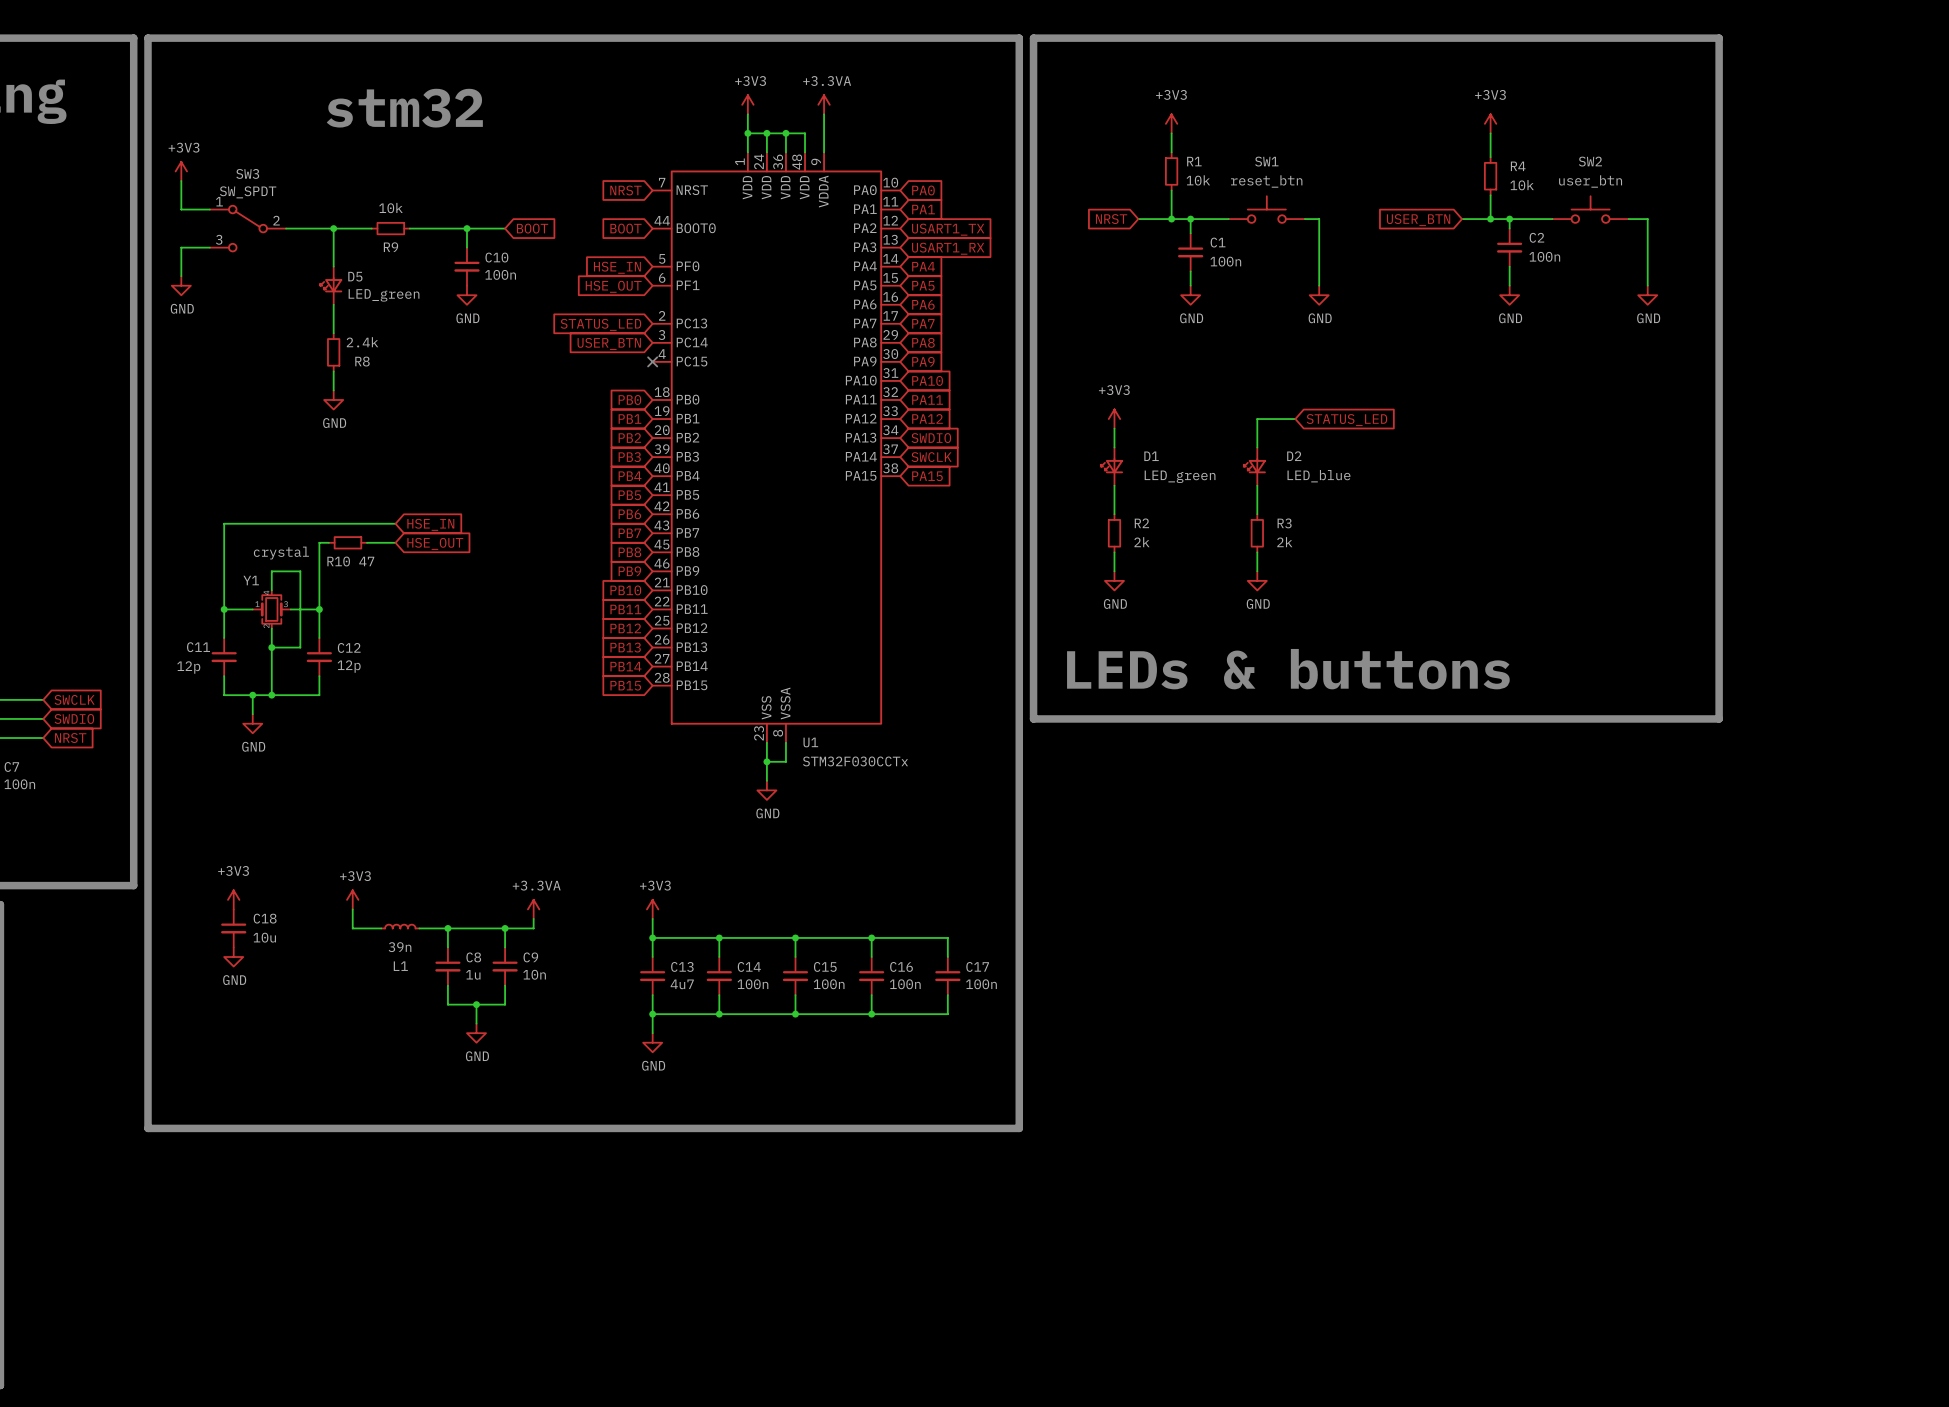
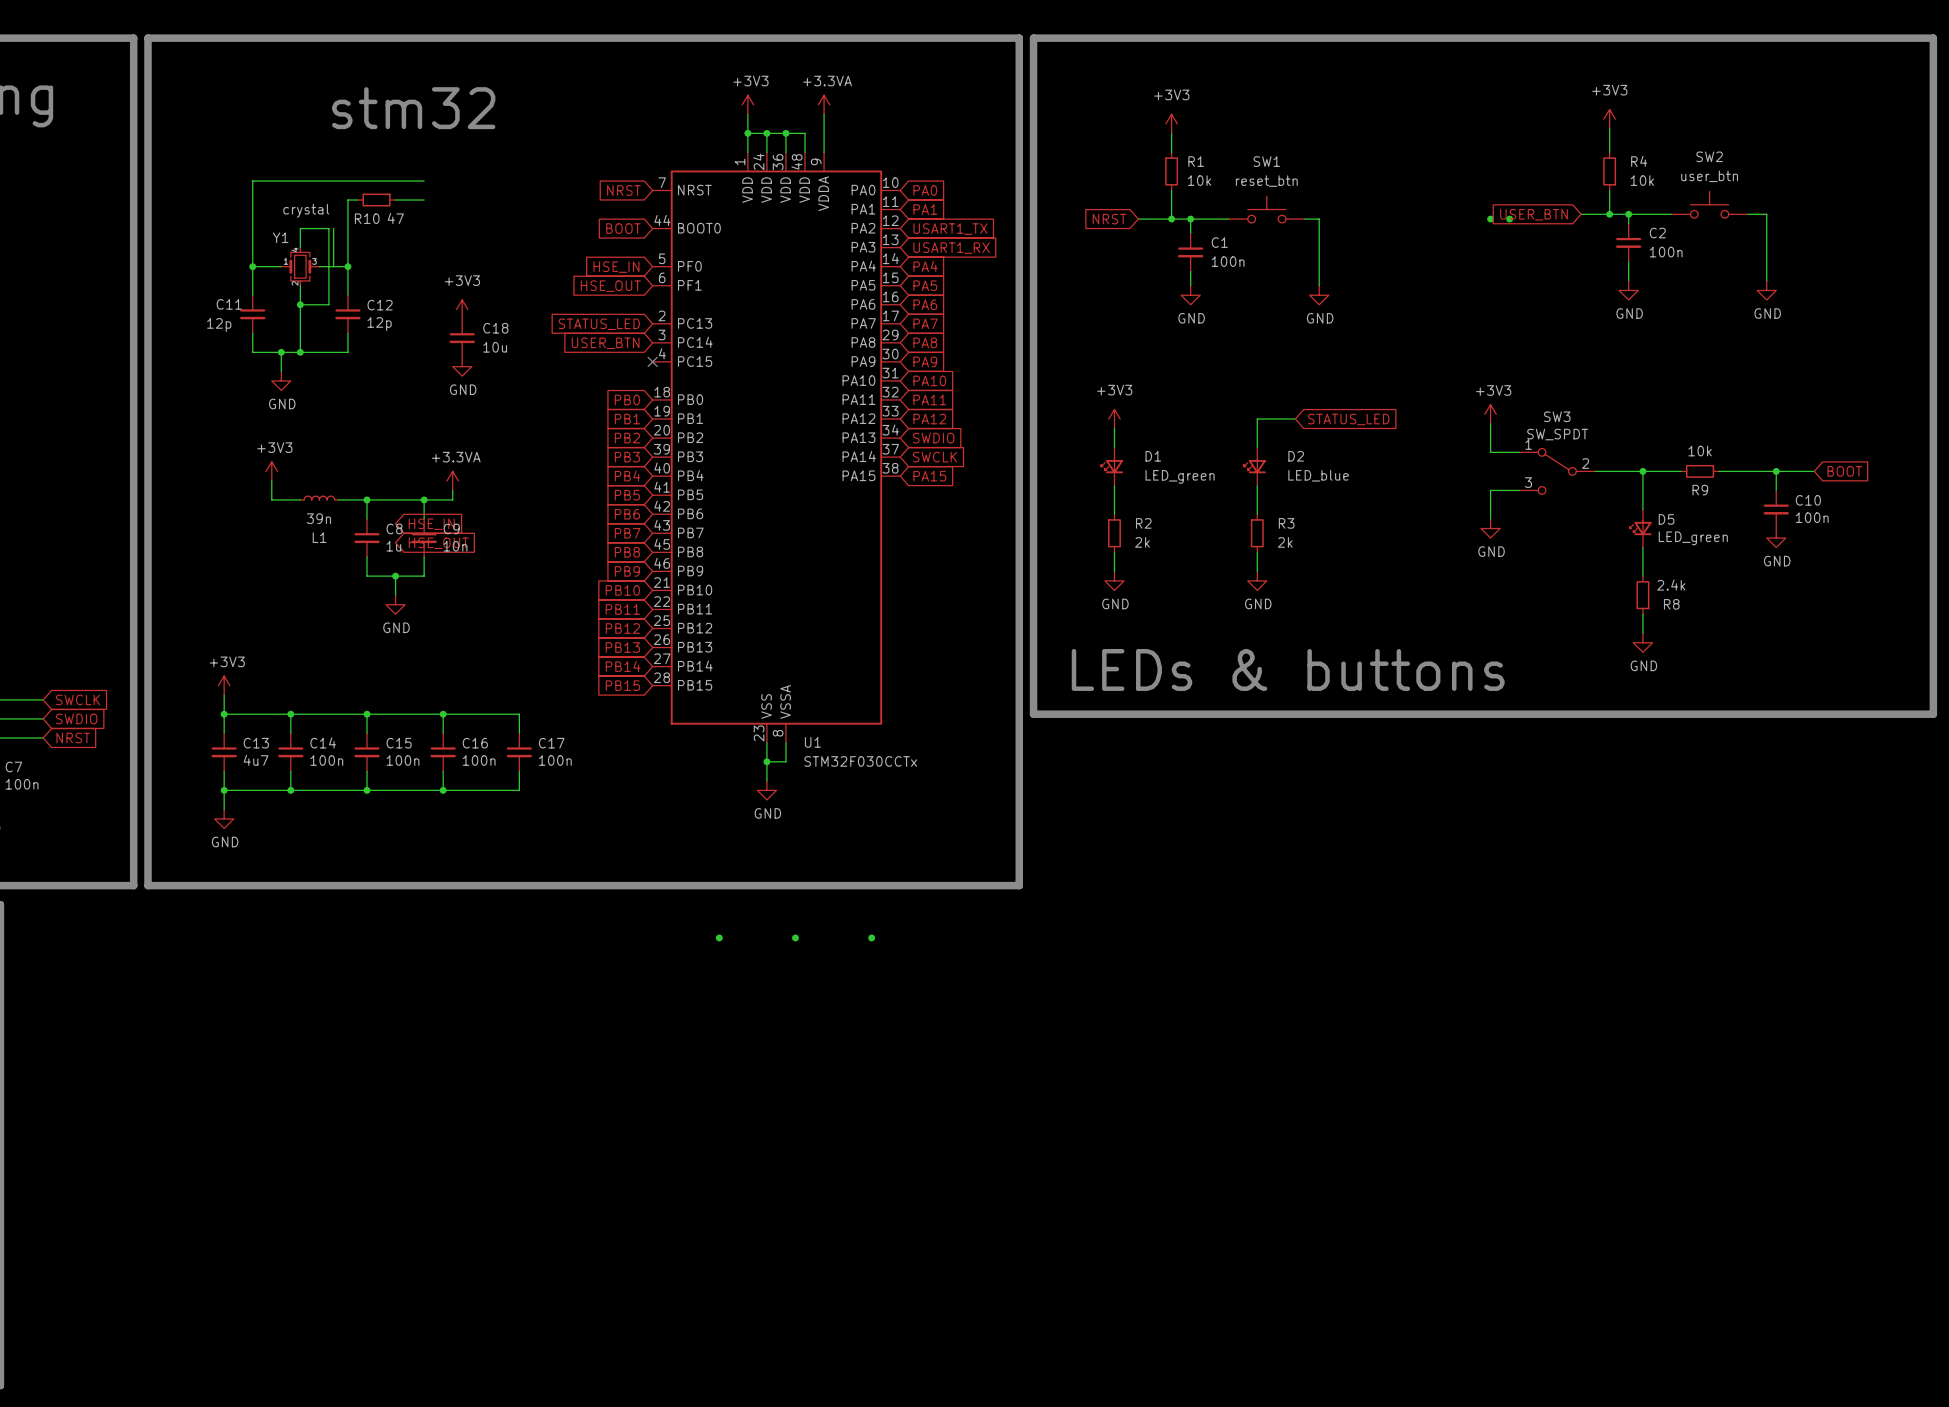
line: (1719, 38) (1719, 718) (1033, 718) (1033, 714) -> (1719, 38) (1933, 38) (1933, 714) (1033, 714)
power symbol position: +3V3 (1490, 123) -> +3V3 (1609, 119)
wire: (1490, 133) (1490, 157) -> (1609, 128) (1609, 152)
power symbol: +3V3 (181, 171) -> none
R4 position: (1490, 176) -> (1609, 171)
wire: (181, 180) (181, 209) (209, 209) -> none
wire: none -> (424, 180) (252, 180) (252, 295)
wire: (1490, 195) (1490, 219) -> (1609, 190) (1609, 214)
wire: none -> (357, 200) (347, 200) (347, 295)
wire: none -> (395, 200) (424, 200)
SW2 position: (1590, 209) -> (1709, 204)
junction: none -> (1609, 214)
junction: none -> (1628, 214)
wire: (1462, 219) (1552, 219) -> (1581, 214) (1671, 214)
wire: (1628, 219) (1647, 219) (1647, 285) -> (1747, 214) (1766, 214) (1766, 280)
global label position: USER_BTN (1418, 220) -> USER_BTN (1534, 214)
SW3 position: (247, 228) -> (1557, 471)
wire: (286, 228) (300, 228) -> (300, 247) (300, 228)
wire: (328, 228) (371, 228) -> (328, 228) (328, 304) (300, 304)
junction position: (333, 228) -> (347, 266)
R9 position: (390, 228) -> (1700, 471)
wire: (409, 228) (505, 228) -> none
wire: (466, 228) (466, 247) -> none
junction: (466, 228) -> none
global label: BOOT (532, 228) -> none
wire: (209, 247) (181, 247) (181, 276) -> none
C2 position: (1509, 247) -> (1628, 242)
wire: none -> (252, 266) (281, 266)
junction: none -> (252, 266)
wire: none -> (319, 266) (347, 266)
C10 position: (466, 266) -> (1776, 509)
wire: (1509, 266) (1509, 285) -> (1628, 261) (1628, 280)
power symbol: GND (181, 285) -> none
wire: none -> (300, 285) (300, 352)
D5 position: (331, 285) -> (1640, 528)
power symbol: none -> GND (1766, 290)
power symbol: GND (466, 295) -> none
power symbol: GND (1509, 295) -> none
power symbol position: GND (1647, 295) -> GND (1628, 290)
junction: none -> (300, 304)
wire: (333, 304) (333, 333) -> none
power symbol: none -> +3V3 (462, 309)
wire: none -> (252, 333) (252, 352) (347, 352) (347, 333)
junction: none -> (281, 352)
junction: none -> (300, 352)
R8 position: (333, 352) -> (1642, 595)
power symbol: none -> GND (462, 366)
wire: (333, 371) (333, 390) -> (281, 352) (281, 371)
power symbol position: GND (333, 399) -> GND (281, 380)
power symbol: none -> +3V3 (1490, 414)
wire: none -> (1490, 423) (1490, 452) (1519, 452)
power symbol: none -> +3V3 (271, 471)
wire: none -> (1595, 471) (1681, 471)
wire: none -> (1642, 471) (1642, 509)
junction: none -> (1642, 471)
wire: none -> (1719, 471) (1814, 471)
wire: none -> (1776, 471) (1776, 490)
junction: none -> (1776, 471)
global label: none -> BOOT (1844, 471)
wire: none -> (271, 480) (271, 499) (300, 499)
power symbol: none -> +3.3VA (452, 480)
wire: none -> (452, 490) (452, 499) (338, 499)
wire: none -> (1519, 490) (1490, 490) (1490, 519)
wire: none -> (367, 499) (367, 519)
junction: none -> (367, 499)
wire: none -> (424, 499) (424, 519)
junction: none -> (424, 499)
wire: (395, 523) (224, 523) (224, 638) -> none
power symbol: none -> GND (1490, 528)
power symbol: none -> GND (1776, 538)
wire: (328, 542) (319, 542) (319, 638) -> none
R10 position: (347, 542) -> (376, 200)
wire: none -> (1642, 547) (1642, 576)
wire: none -> (367, 557) (367, 576) (424, 576) (424, 557)
wire: none -> (395, 576) (395, 595)
junction: none -> (395, 576)
wire: (271, 590) (271, 571) (300, 571) (300, 647) (271, 647) -> none
power symbol: none -> GND (395, 604)
wire: (224, 609) (252, 609) -> none
junction: (224, 609) -> none
Y1 position: (271, 609) -> (300, 266)
wire: (290, 609) (319, 609) -> none
junction: (319, 609) -> none
wire: none -> (1642, 614) (1642, 633)
wire: (271, 628) (271, 695) -> none
power symbol: none -> GND (1642, 642)
junction: (271, 647) -> none
C11 position: (224, 657) -> (252, 314)
C12 position: (319, 657) -> (347, 314)
wire: (224, 676) (224, 695) (319, 695) (319, 676) -> none
power symbol: none -> +3V3 (224, 685)
wire: none -> (224, 695) (224, 733)
wire: (252, 695) (252, 714) -> (290, 714) (290, 733)
junction: (252, 695) -> none
junction: (271, 695) -> none
wire: none -> (224, 714) (519, 714) (519, 733)
junction: none -> (224, 714)
junction: none -> (290, 714)
wire: none -> (367, 714) (367, 733)
junction: none -> (367, 714)
wire: none -> (443, 714) (443, 733)
junction: none -> (443, 714)
power symbol: GND (252, 723) -> none
wire: none -> (224, 771) (224, 809)
wire: none -> (290, 771) (290, 790)
wire: none -> (367, 771) (367, 790)
wire: none -> (519, 771) (519, 790) (224, 790)
junction: none -> (224, 790)
junction: none -> (290, 790)
junction: none -> (367, 790)
junction: none -> (443, 790)
power symbol: none -> GND (224, 818)
line: (148, 885) (148, 1128) (1019, 1128) (1019, 885) -> (148, 885) (1019, 885)
power symbol: +3V3 (233, 899) -> none
power symbol: +3V3 (352, 899) -> none
wire: (352, 909) (352, 928) (381, 928) -> none
power symbol: +3.3VA (533, 909) -> none
power symbol: +3V3 (652, 909) -> none
wire: (533, 918) (533, 928) (419, 928) -> none
wire: (652, 918) (652, 957) -> none
L1 position: (400, 926) -> (319, 498)
C18 position: (233, 928) -> (462, 338)
wire: (447, 928) (447, 947) -> (443, 771) (443, 790)
junction: (447, 928) -> none
wire: (505, 928) (505, 947) -> none
junction: (505, 928) -> none
wire: (652, 937) (947, 937) (947, 957) -> none
junction: (652, 937) -> none
wire: (719, 937) (719, 957) -> none
wire: (795, 937) (795, 957) -> none
wire: (871, 937) (871, 957) -> none
power symbol: GND (233, 957) -> none
C8 position: (447, 966) -> (367, 538)
C9 position: (505, 966) -> (424, 538)
C13 position: (652, 976) -> (224, 752)
C14 position: (719, 976) -> (290, 752)
C15 position: (795, 976) -> (367, 752)
C16 position: (871, 976) -> (443, 752)
C17 position: (947, 976) -> (519, 752)
wire: (447, 985) (447, 1004) (505, 1004) (505, 985) -> none
wire: (652, 995) (652, 1033) -> none
wire: (719, 995) (719, 1014) -> none
wire: (795, 995) (795, 1014) -> none
wire: (871, 995) (871, 1014) -> none
wire: (947, 995) (947, 1014) (652, 1014) -> none
wire: (476, 1004) (476, 1023) -> none
junction: (476, 1004) -> none
junction: (652, 1014) -> none
junction: (719, 1014) -> none
junction: (795, 1014) -> none
junction: (871, 1014) -> none
power symbol: GND (476, 1033) -> none
power symbol: GND (652, 1042) -> none

